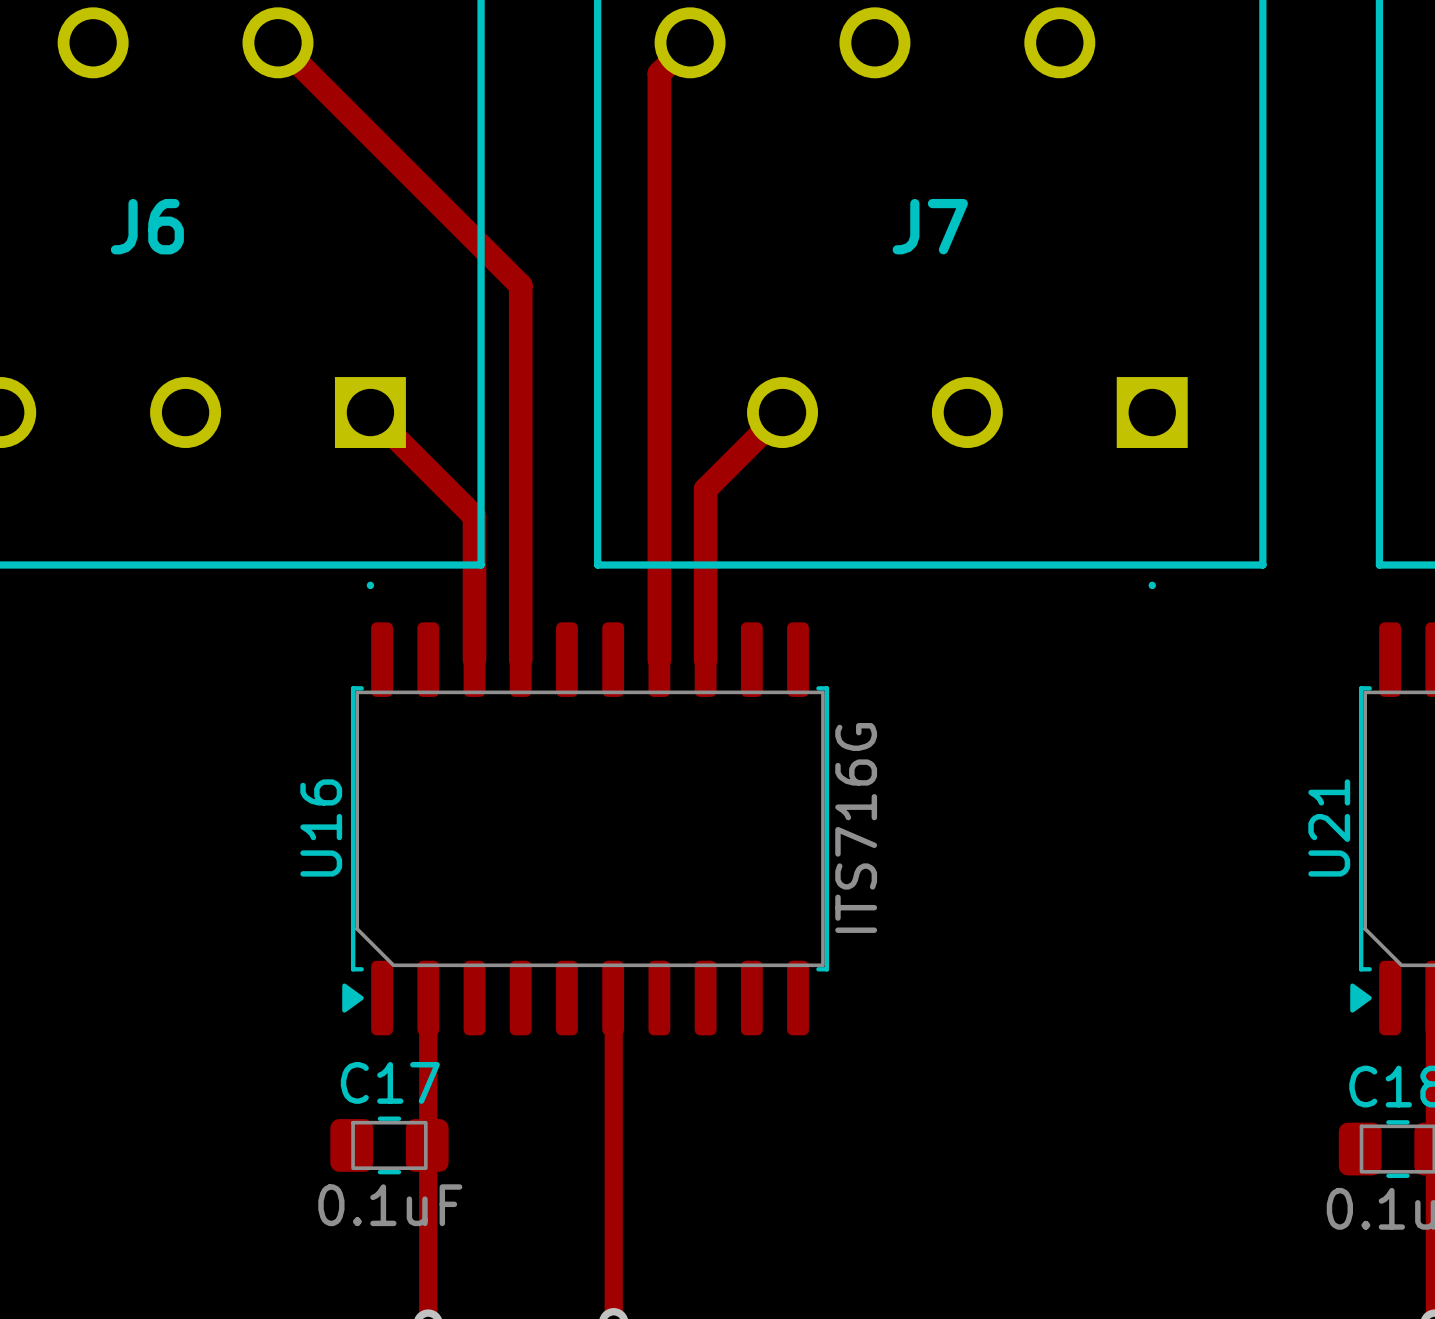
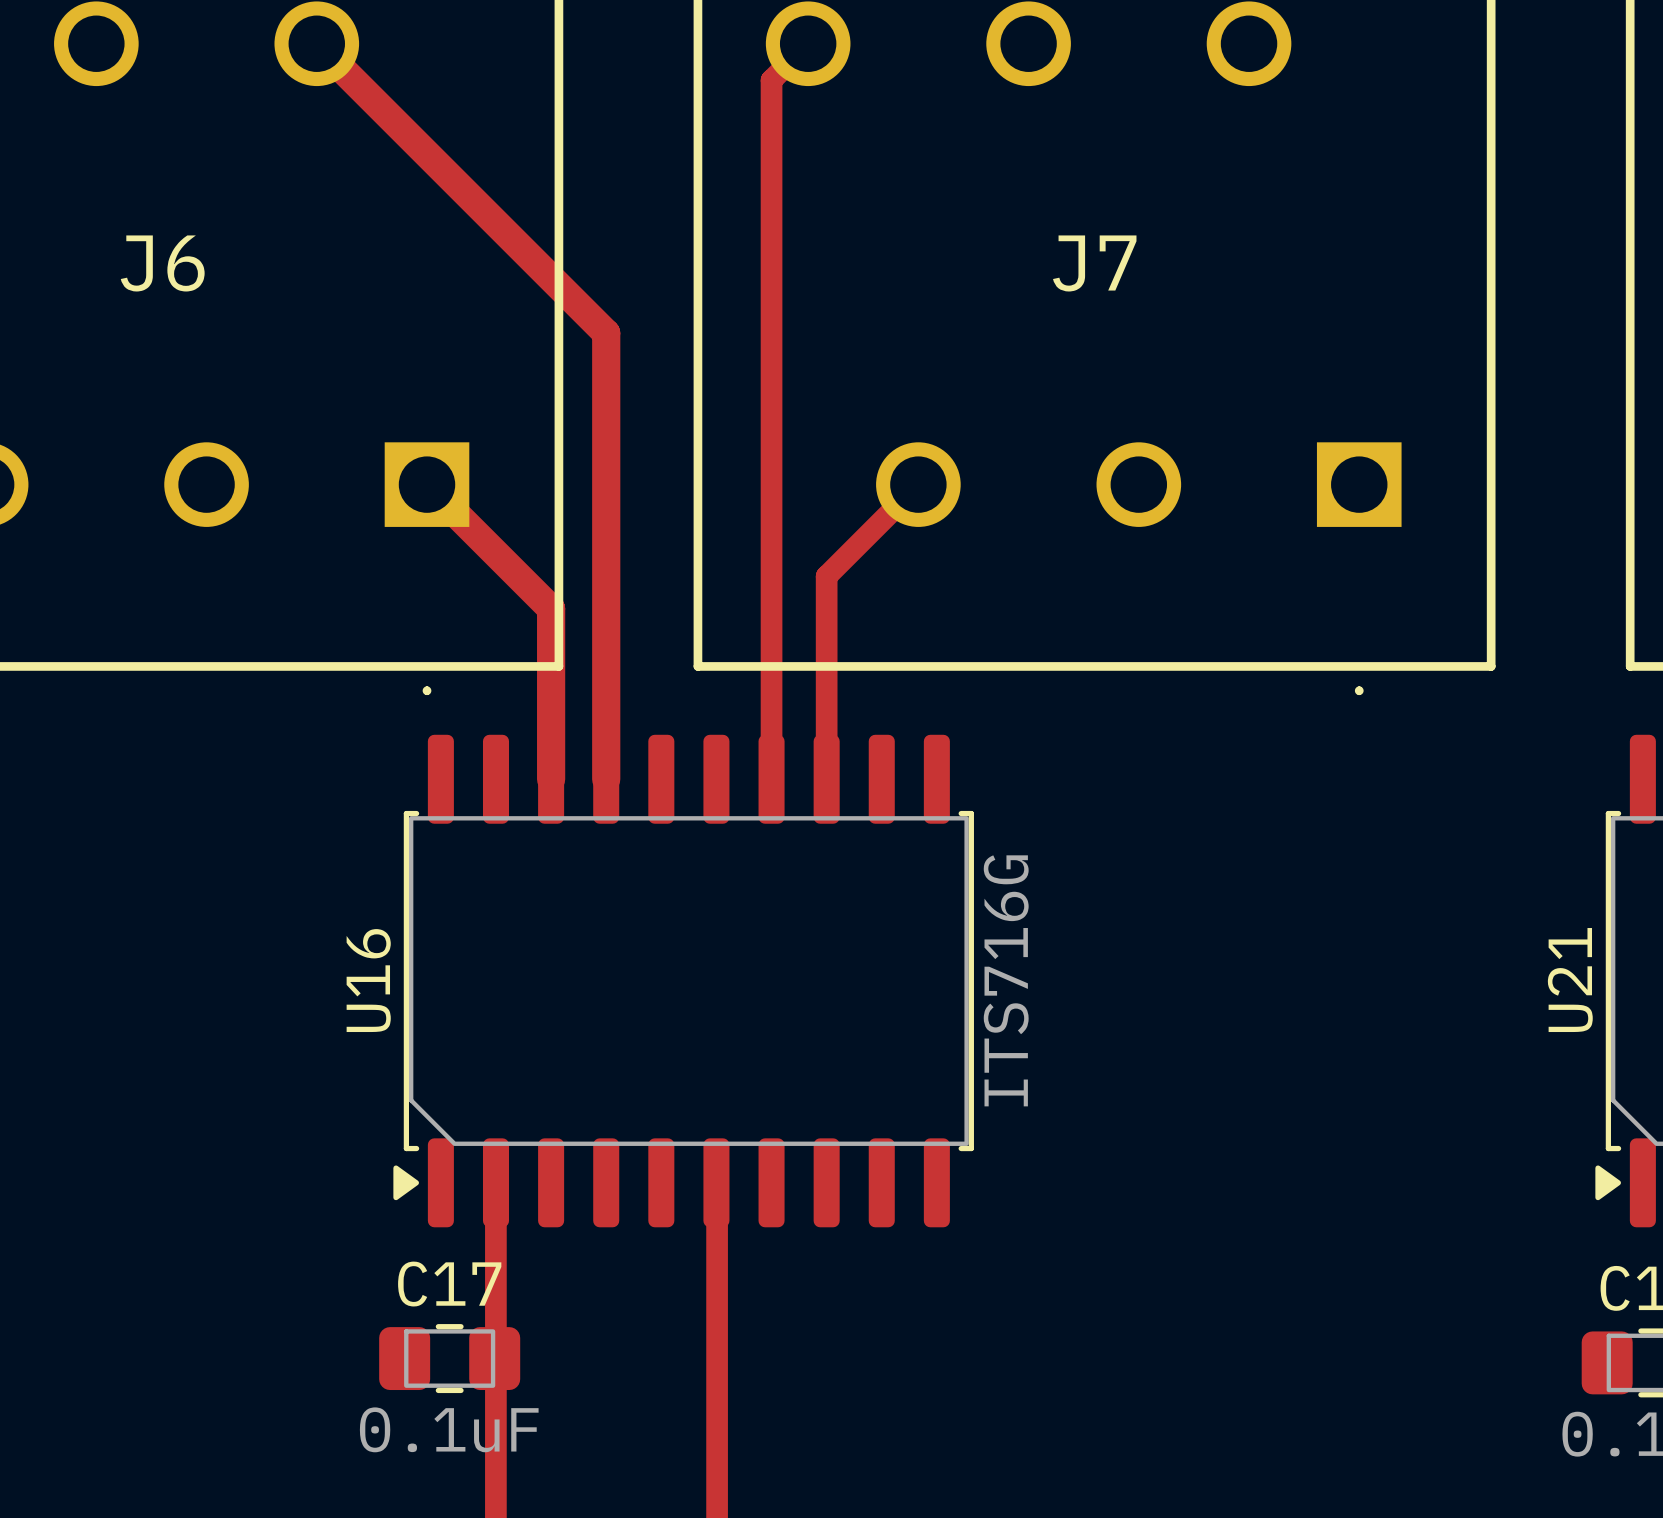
track width: thick (690, 42) (659, 73) (659, 659) -> thin (808, 43) (771, 80) (771, 779)
track width: thick (782, 412) (705, 489) (705, 659) -> thin (918, 484) (826, 576) (826, 779)

